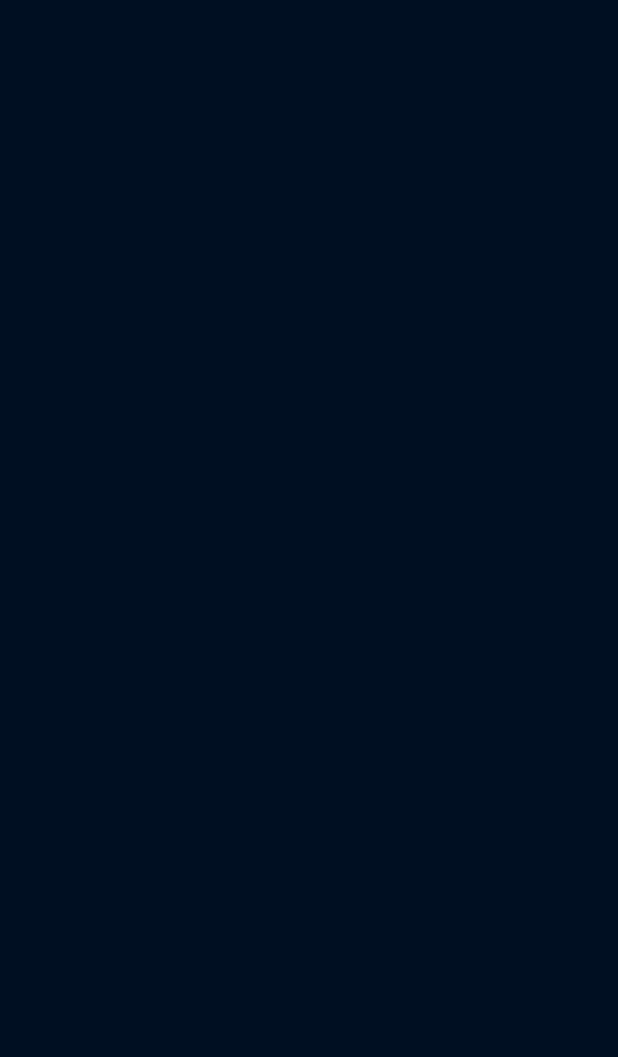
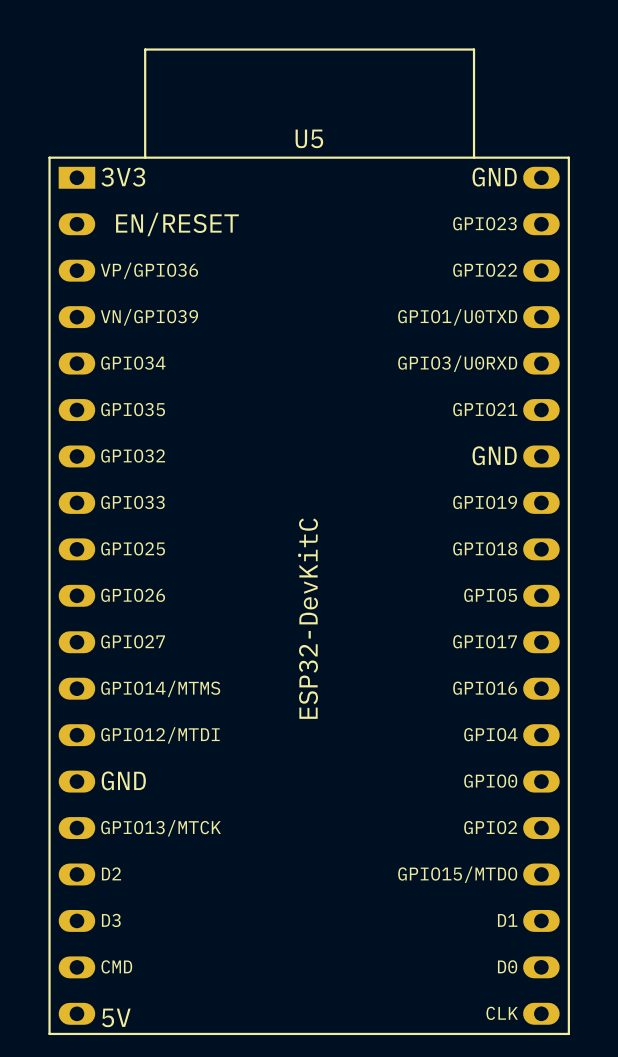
U5: none -> ESP32-DevKitC (309, 541)

